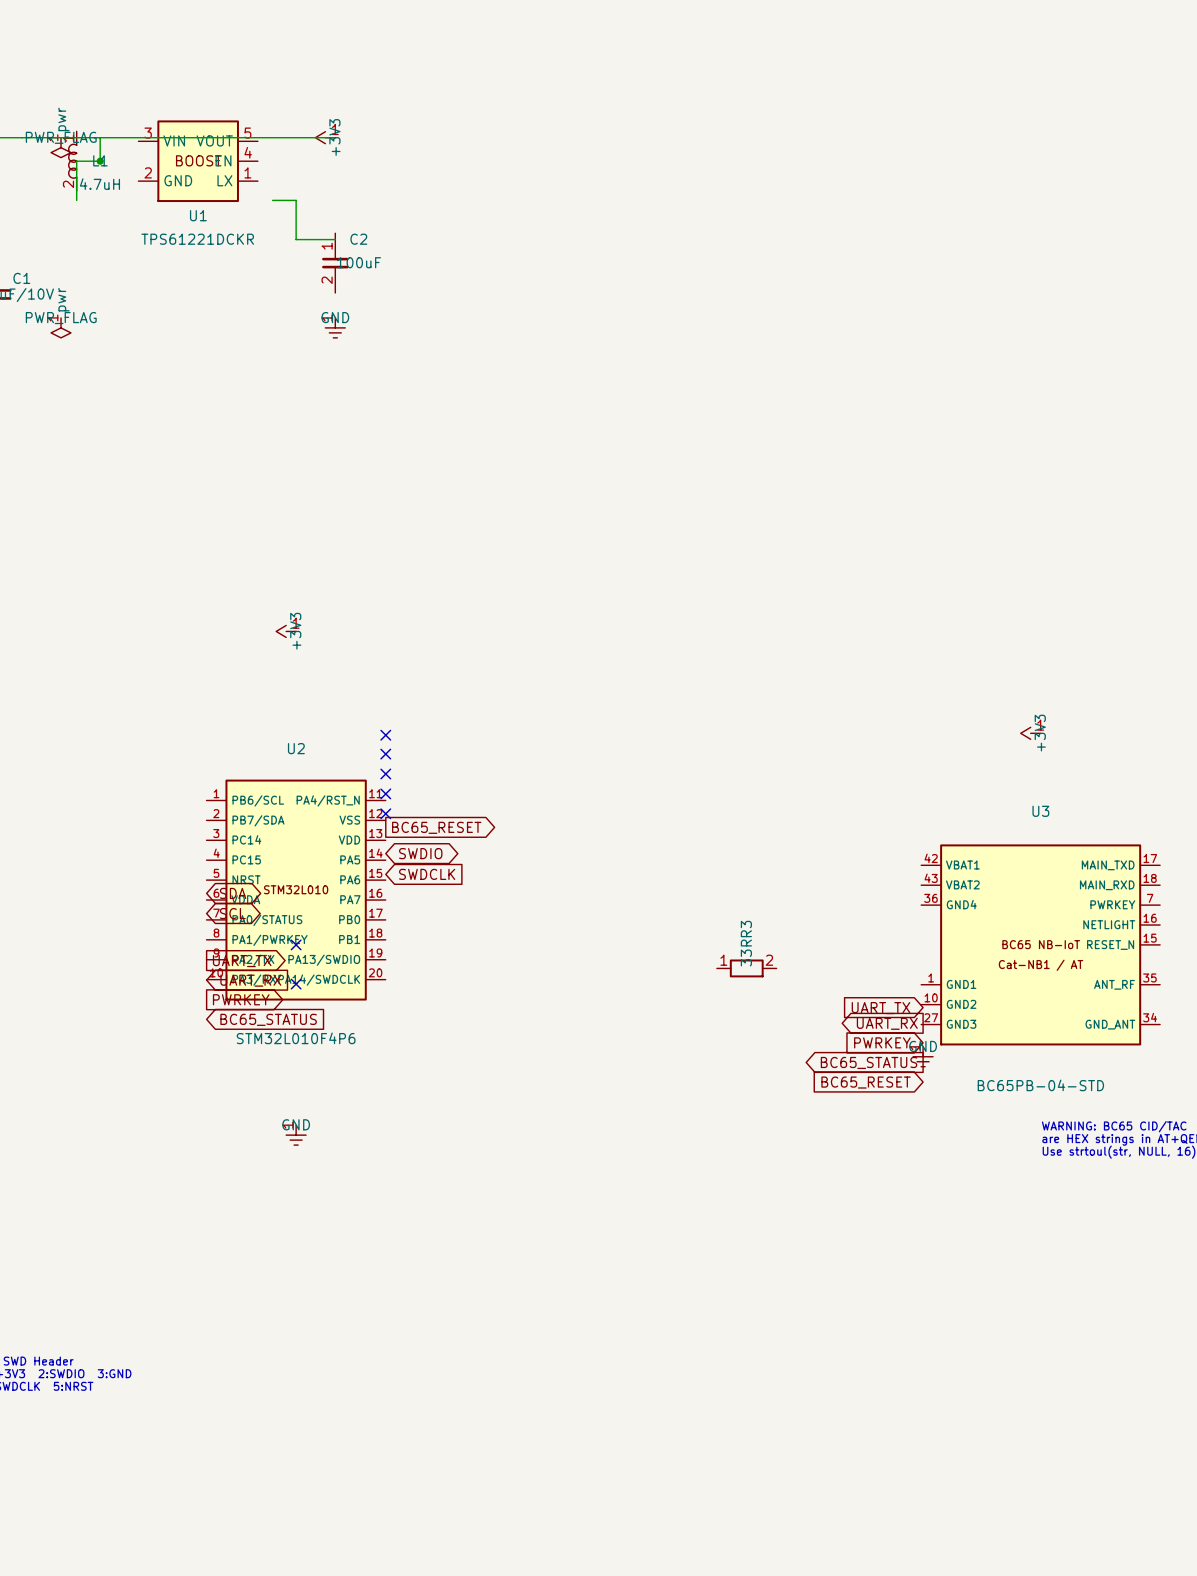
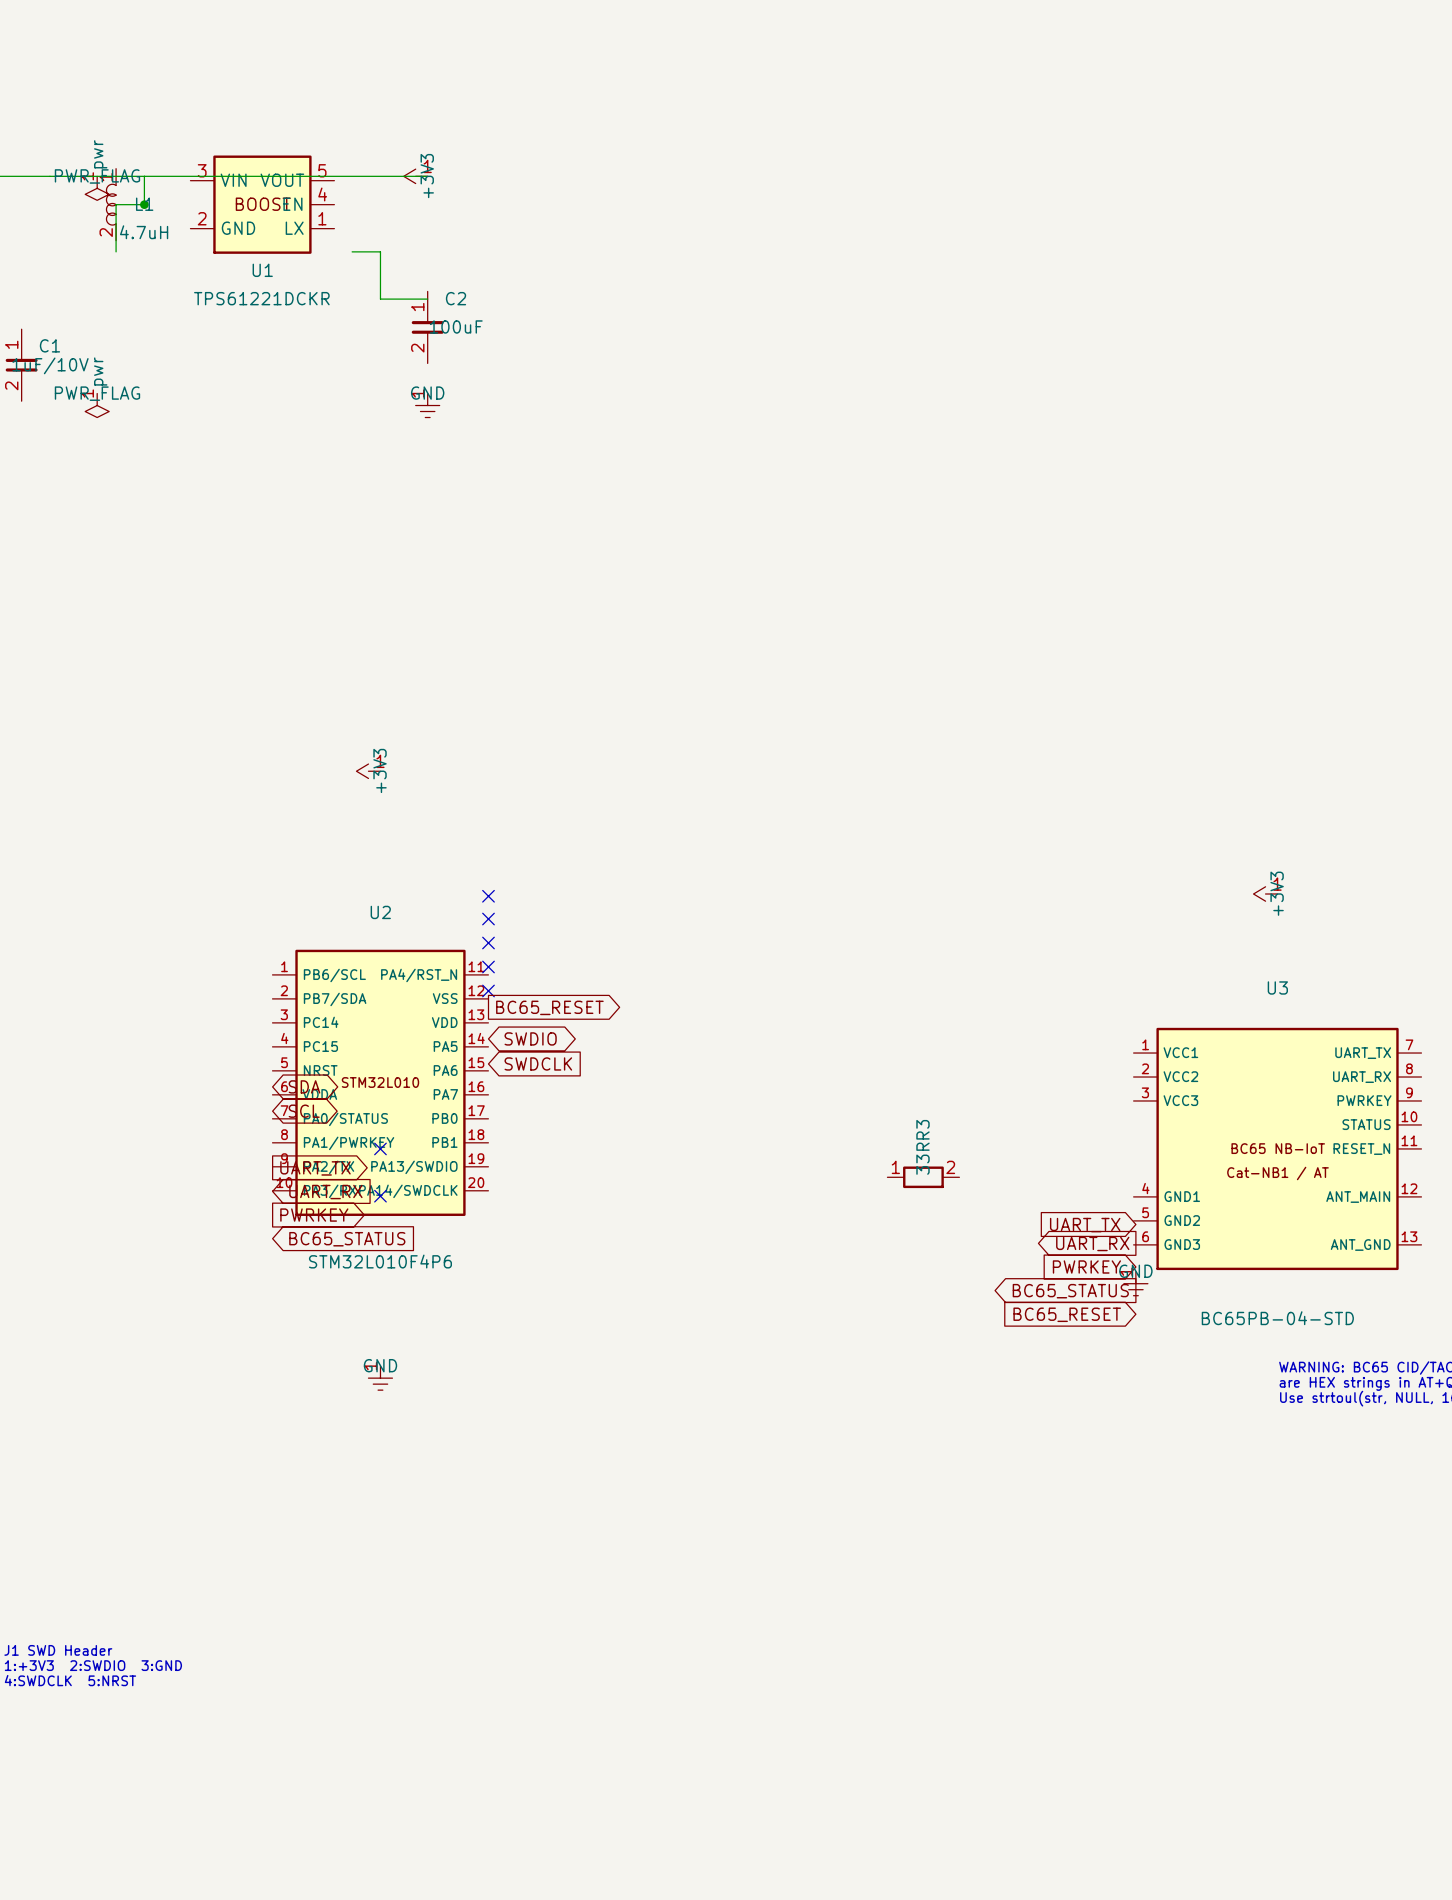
U3 symbol: [921, 844, 1161, 1046] -> [1133, 1027, 1422, 1271]

